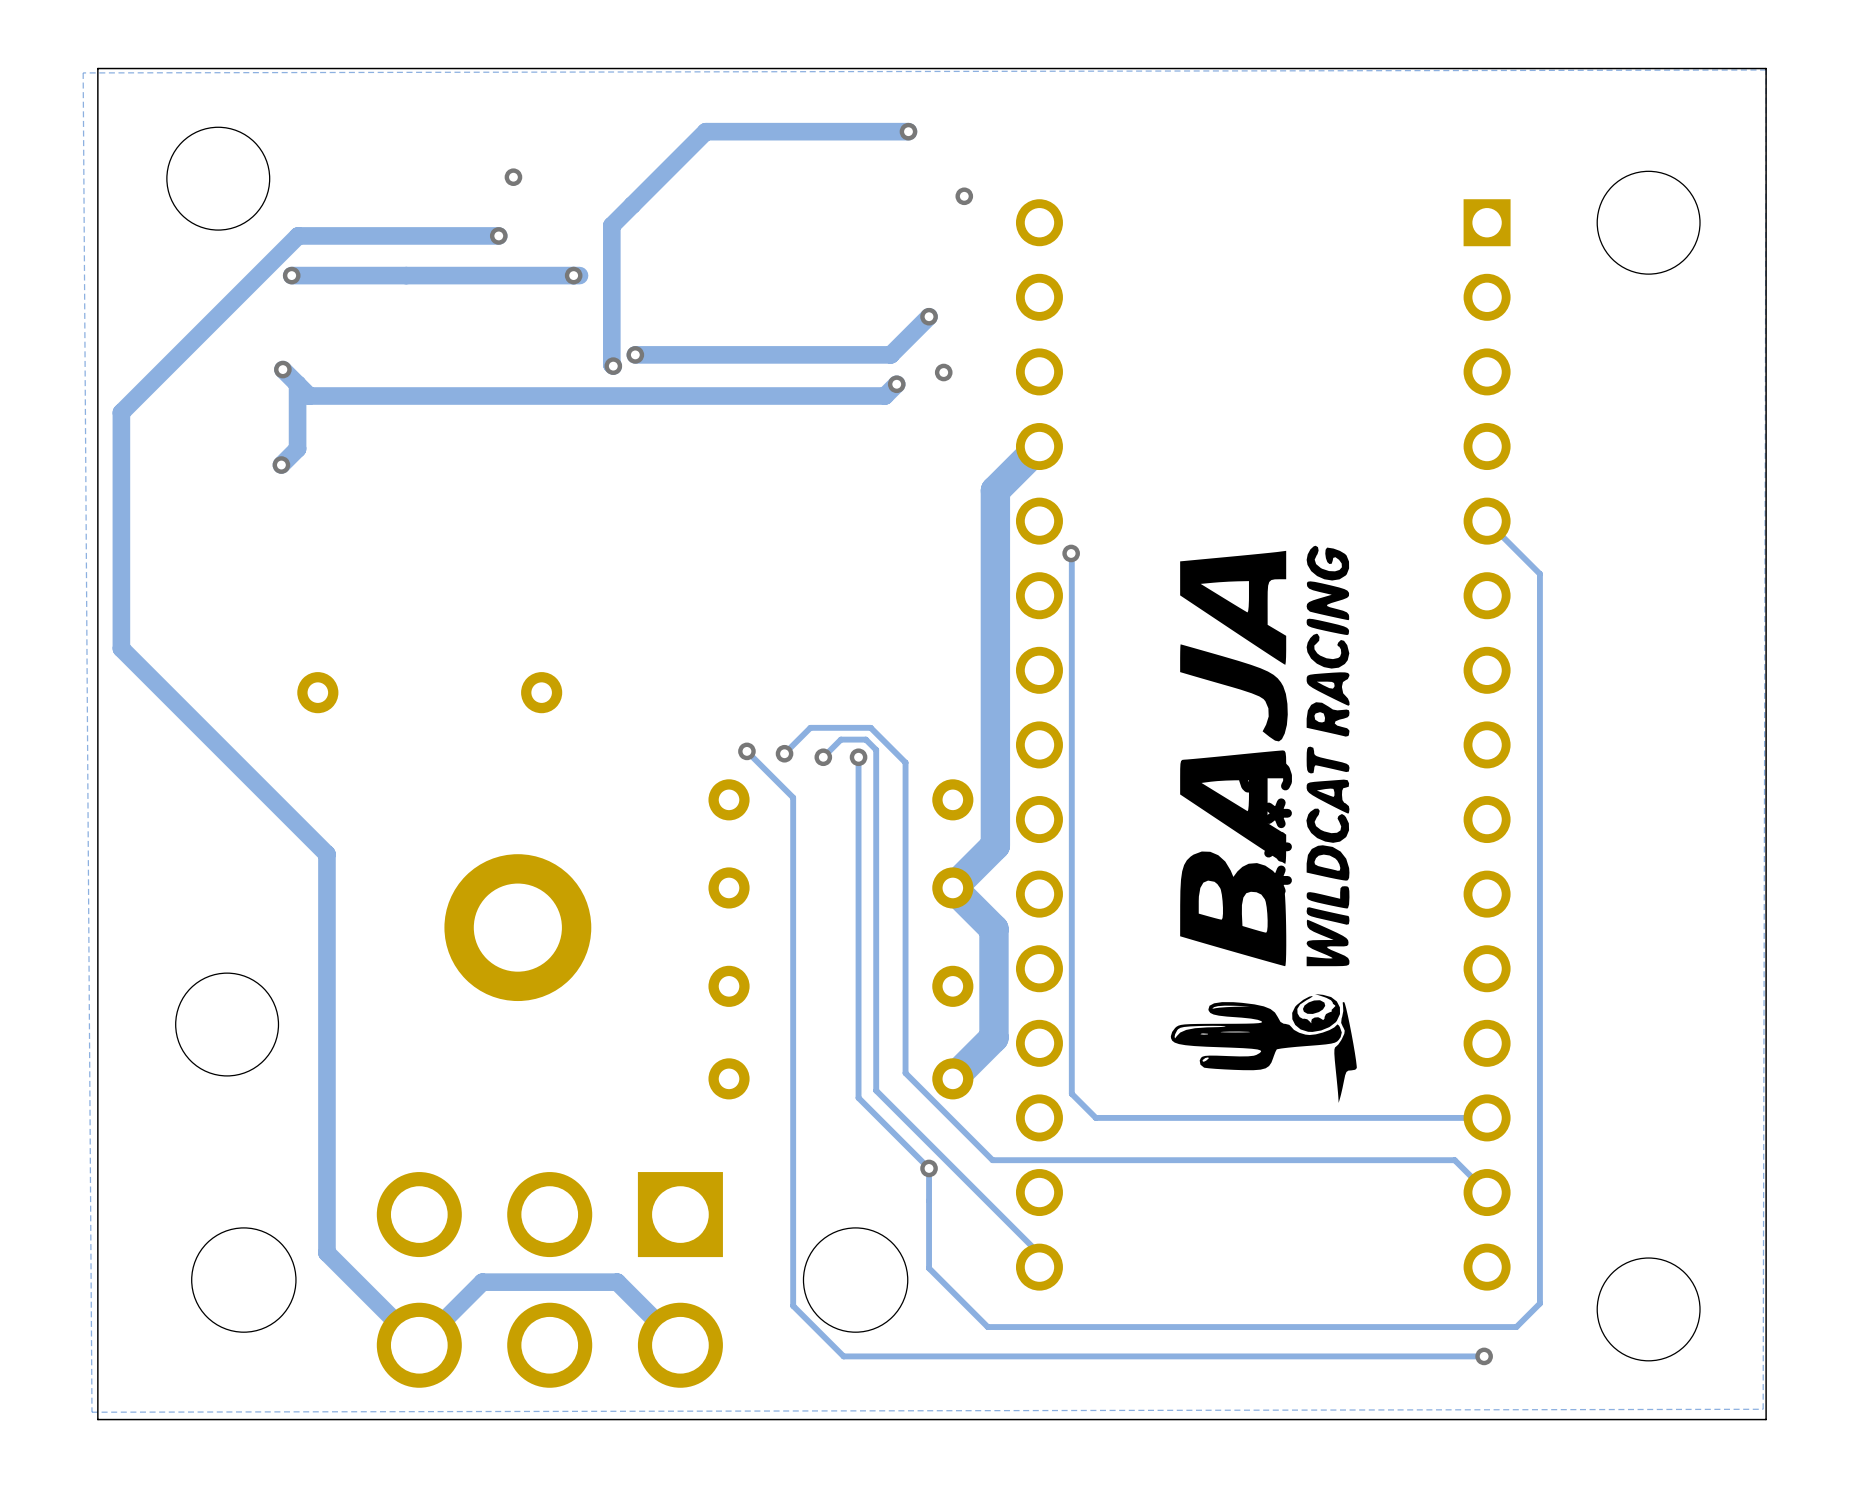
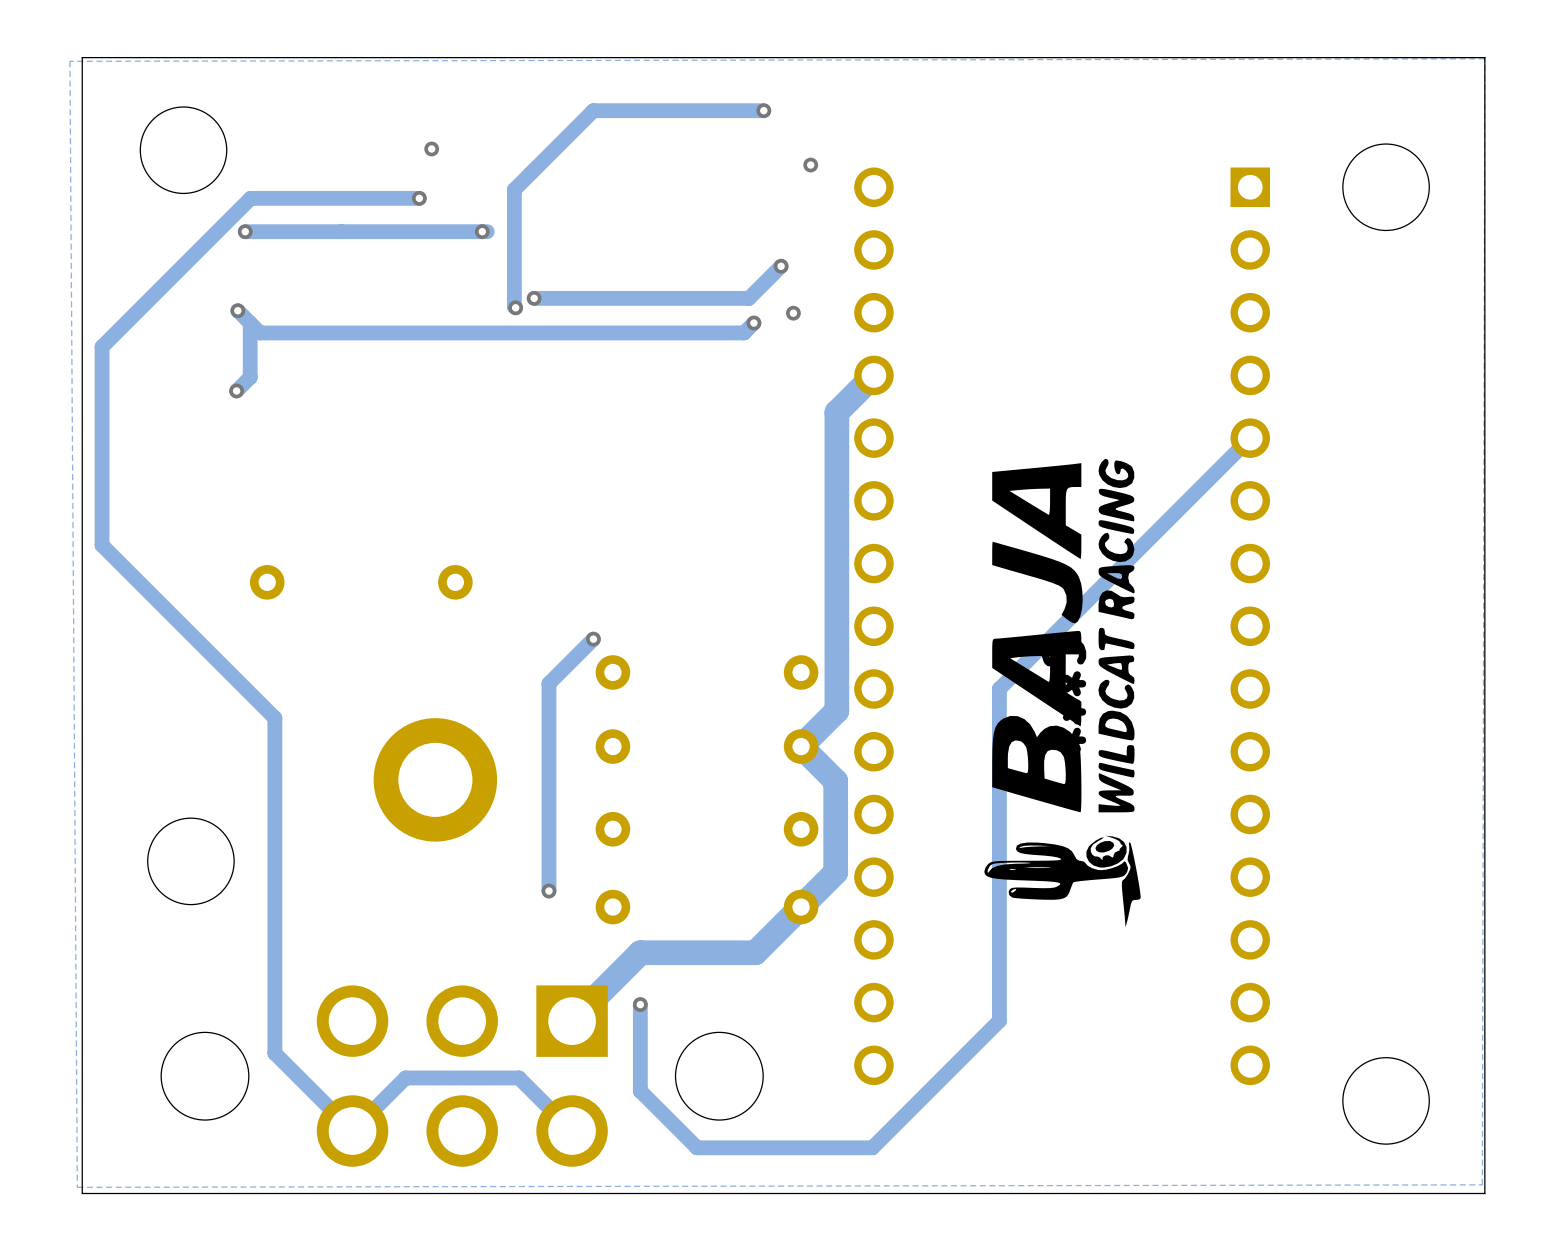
track: (1487, 521) (1539, 573) (1539, 1303) (1516, 1327) (987, 1327) (929, 1268) (929, 1168) (858, 1097) (858, 757) -> (1250, 438) (999, 688) (999, 1020) (872, 1147) (697, 1147) (640, 1091) (640, 1004)
track: (1071, 553) (1071, 1093) (1095, 1117) (1487, 1117) -> none
via: (1071, 553) -> none
track: (746, 751) (793, 797) (793, 1305) (843, 1356) (1484, 1356) -> none
via: (746, 751) -> none
track: (784, 753) (810, 727) (870, 727) (905, 762) (905, 1073) (992, 1160) (1454, 1160) (1487, 1192) -> none
via: (784, 753) -> none
track: (823, 757) (840, 739) (865, 739) (876, 749) (876, 1090) (1039, 1253) (1039, 1267) -> none
via: (823, 757) -> none
via: (858, 757) -> none
track: none -> (593, 639) (548, 683) (548, 891)
via: none -> (593, 639)
via: none -> (548, 891)
track: none -> (801, 907) (755, 952) (640, 952) (572, 1021)
via: (929, 1168) -> none
via: none -> (640, 1004)
via: (1484, 1356) -> none

